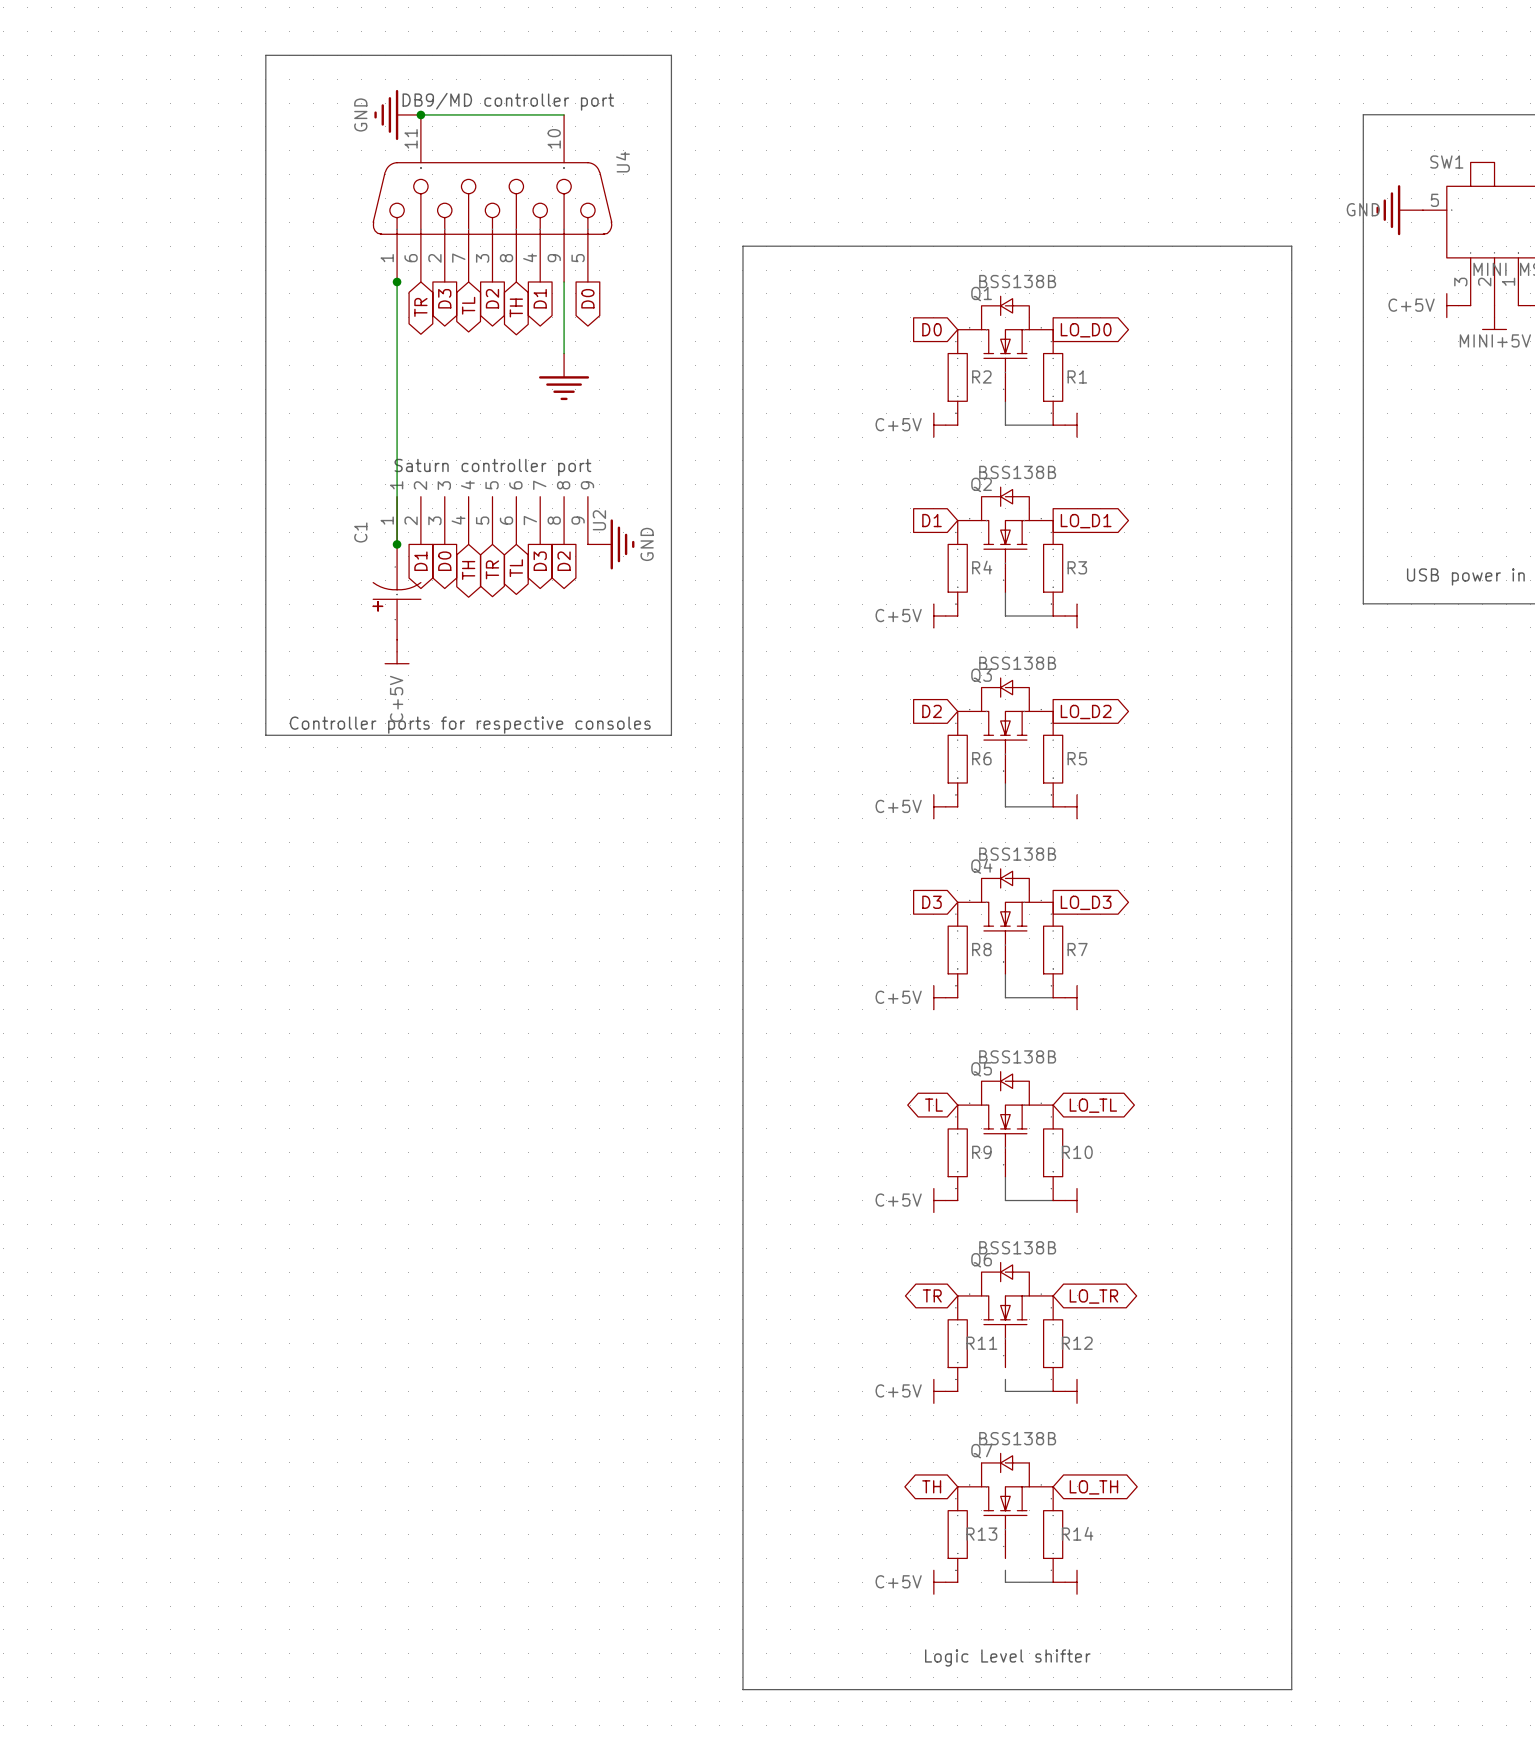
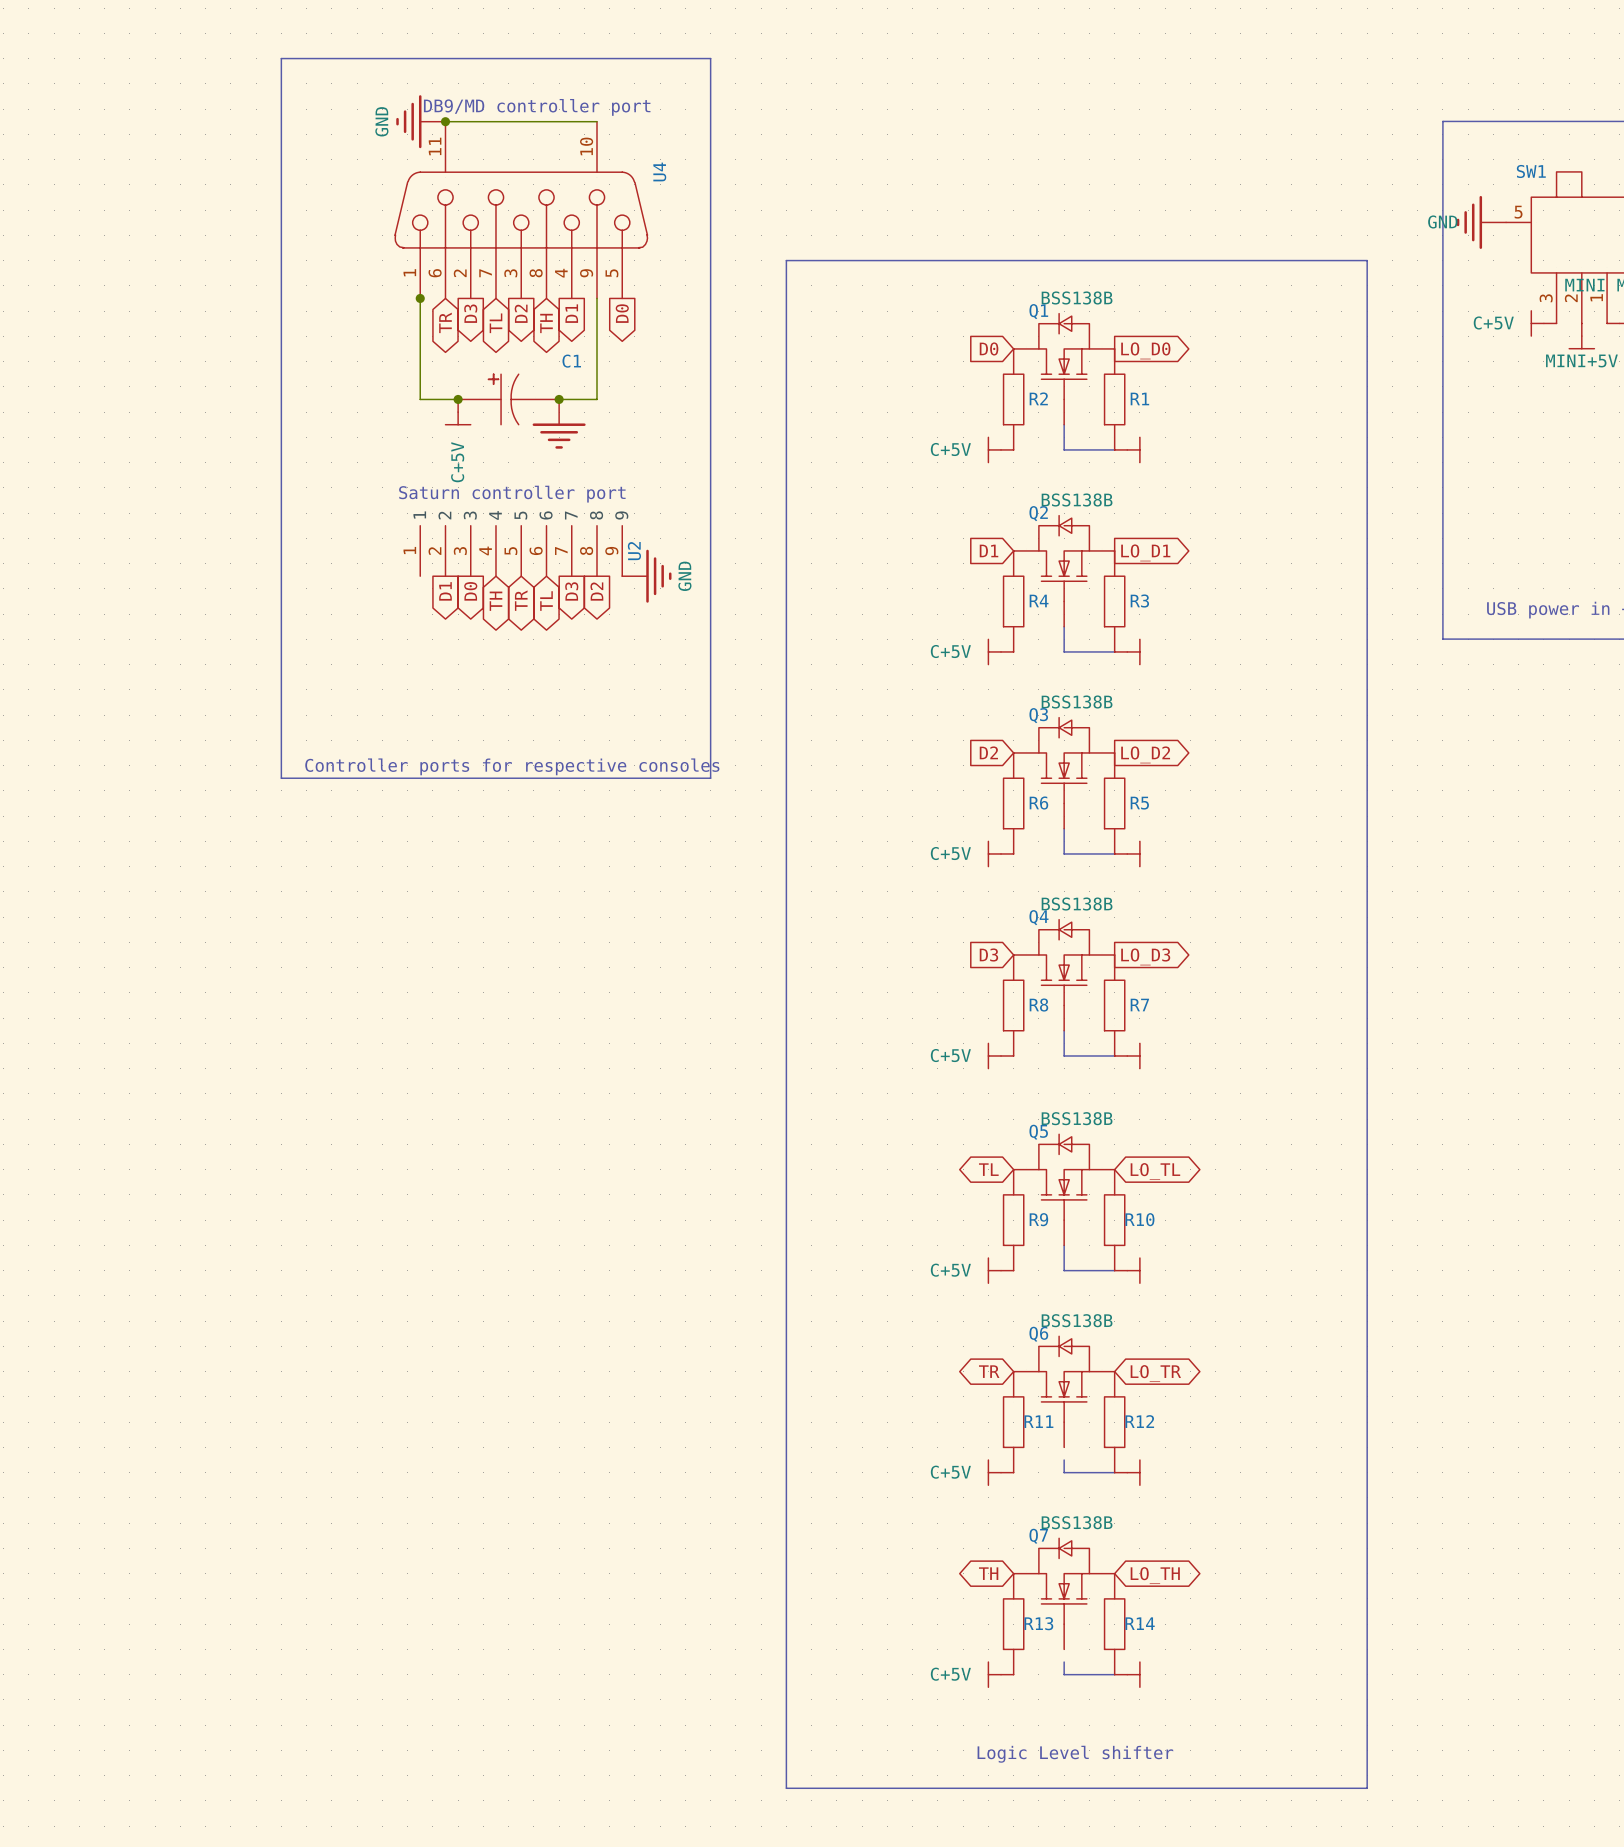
power symbol position: (564, 376) -> (559, 424)
wire: (397, 377) (397, 544) -> (420, 399) (458, 399)
junction: none -> (458, 399)
junction: none -> (559, 399)
power symbol: none -> C+5V (458, 412)
junction: (397, 544) -> none
C1 position: (397, 592) -> (508, 399)
C1 rotation: 0° (397, 596) -> 90° clockwise (503, 399)
power symbol: C+5V (397, 651) -> none

